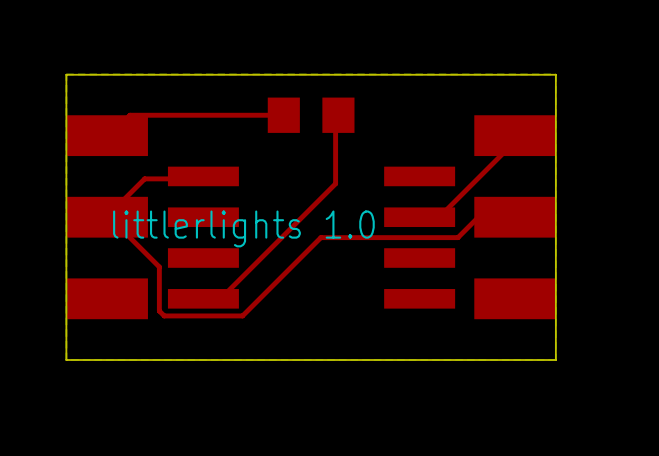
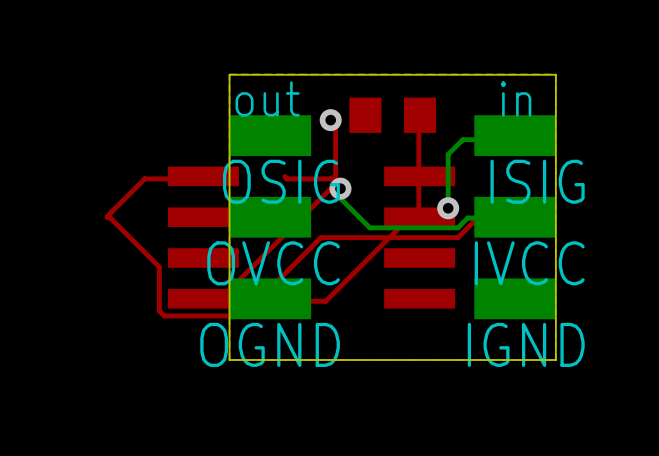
board edge: (229, 74) (66, 74) (66, 360) (229, 360) -> (229, 74) (229, 360)
text: none -> out (267, 98)
text: none -> in (515, 98)
top track: (283, 115) (130, 115) (110, 134) (107, 135) -> none
part position: (311, 115) -> (392, 115)
top track: none -> (420, 115) (418, 208) (325, 301) (286, 301) (285, 298)
via: none -> (330, 120)
OSIG side: top (107, 135) -> bottom (270, 135)
top track: (515, 135) (516, 139) (443, 213) (423, 213) (419, 217) -> none
bottom track: none -> (515, 135) (511, 139) (462, 139) (448, 154) (448, 208)
ISIG side: top (515, 135) -> bottom (515, 135)
top track: none -> (285, 176) (286, 178) (330, 178) (340, 188)
bottom track: none -> (340, 188) (340, 198) (369, 227) (457, 227) (467, 218) (515, 217)
via: none -> (340, 188)
via: none -> (448, 208)
OVCC side: top (107, 217) -> bottom (270, 217)
IVCC side: top (515, 217) -> bottom (515, 217)
text: littlerlights 1.0 (243, 228) -> none
OGND side: top (107, 298) -> bottom (270, 298)
IGND side: top (515, 298) -> bottom (515, 298)

